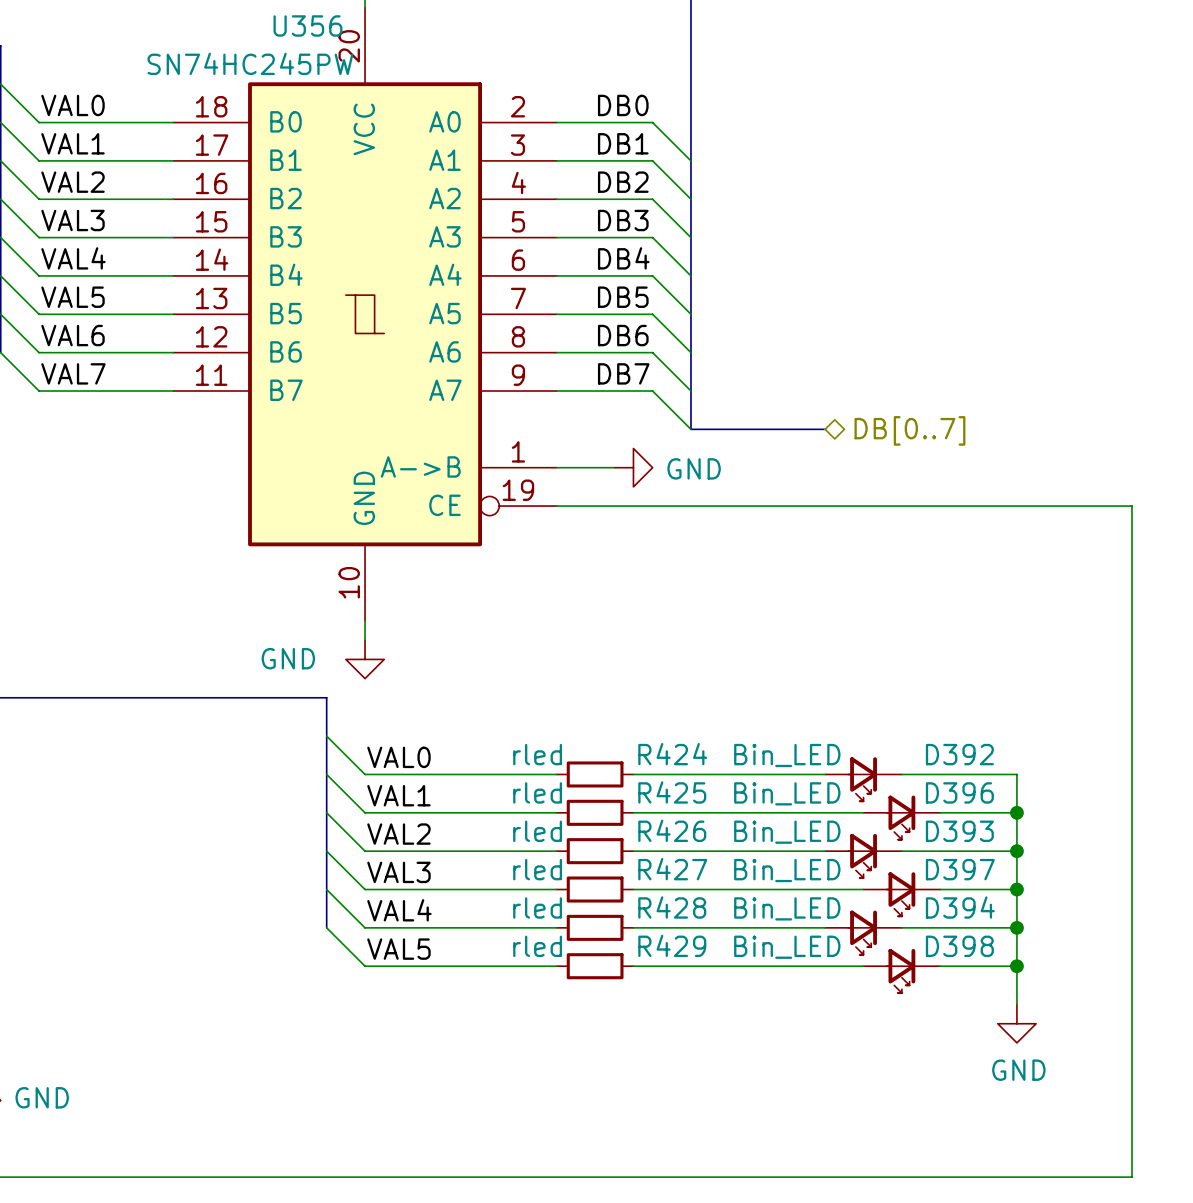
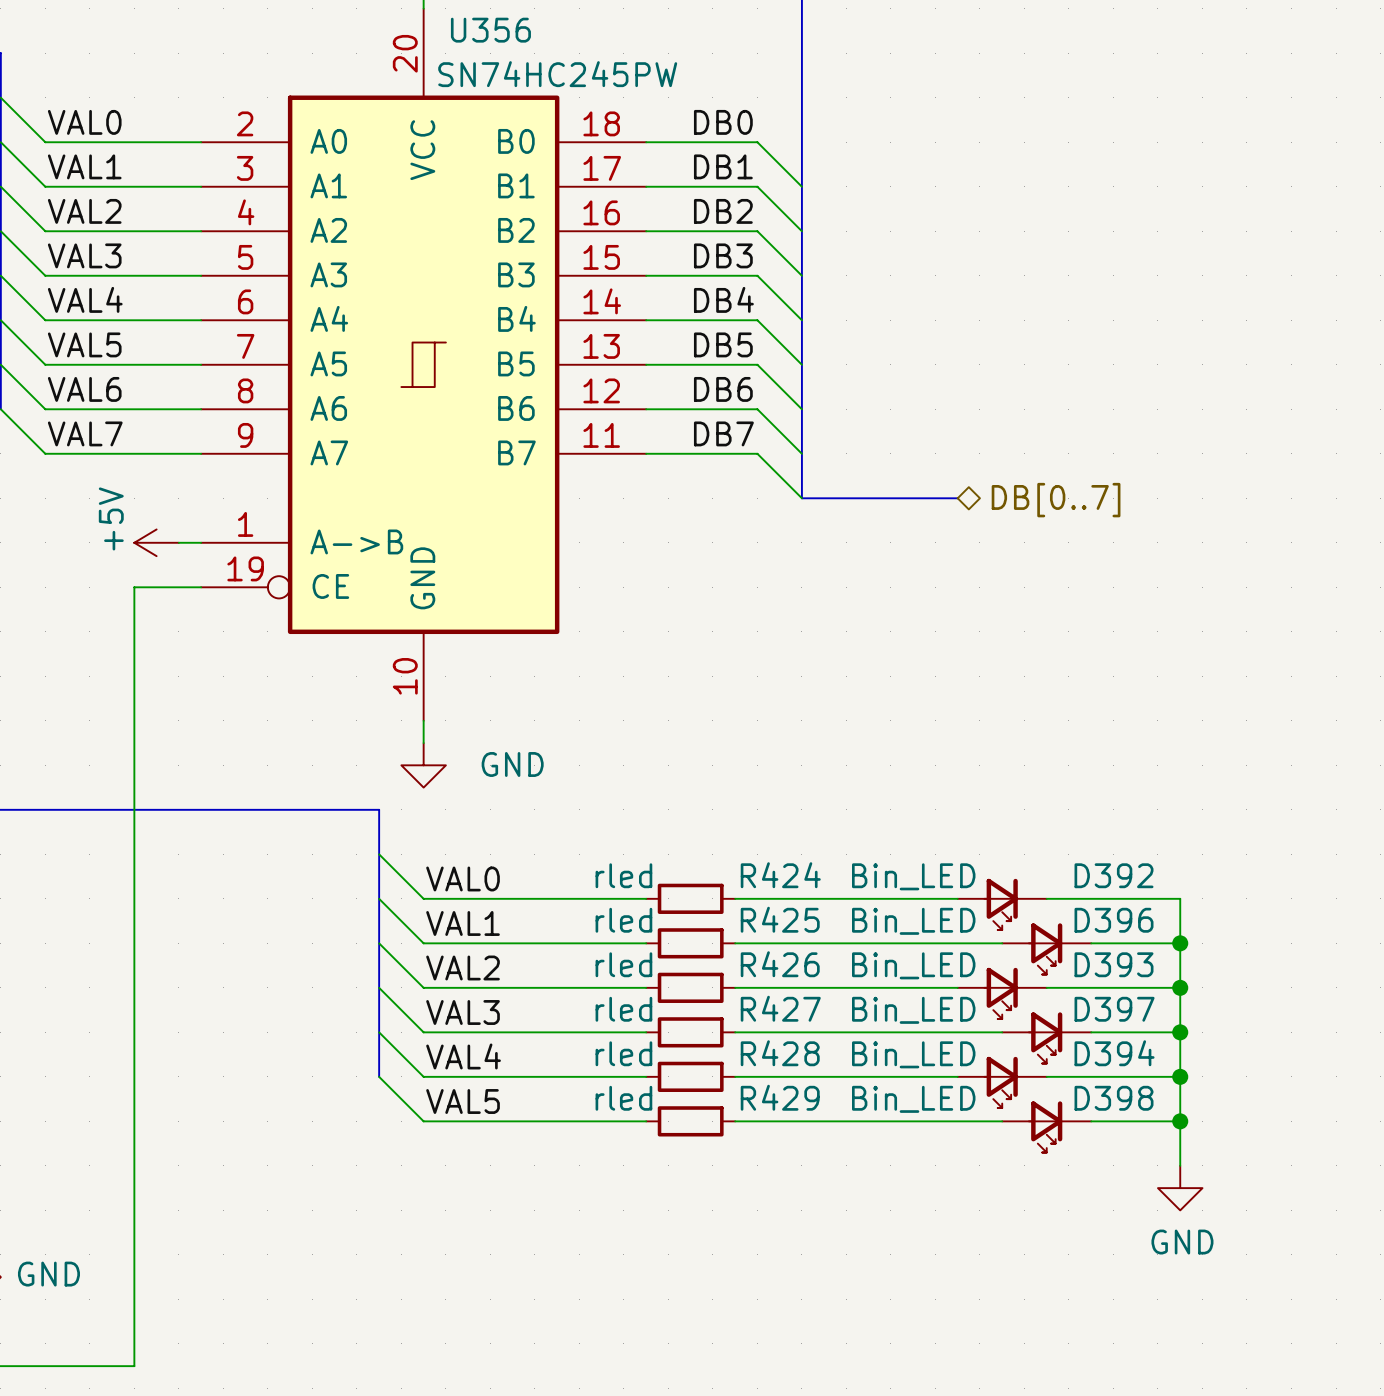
U356 flip: as is (365, 314) -> left-right (423, 364)
power symbol: none -> +5V (156, 542)
wire: none -> (178, 542) (201, 542)
wire: (556, 467) (614, 467) -> none
power symbol: GND (633, 467) -> none
wire: (556, 506) (1131, 506) (1131, 1177) (115, 1177) -> (201, 587) (134, 587) (134, 1366)
power symbol text position: GND (288, 658) -> GND (512, 764)

